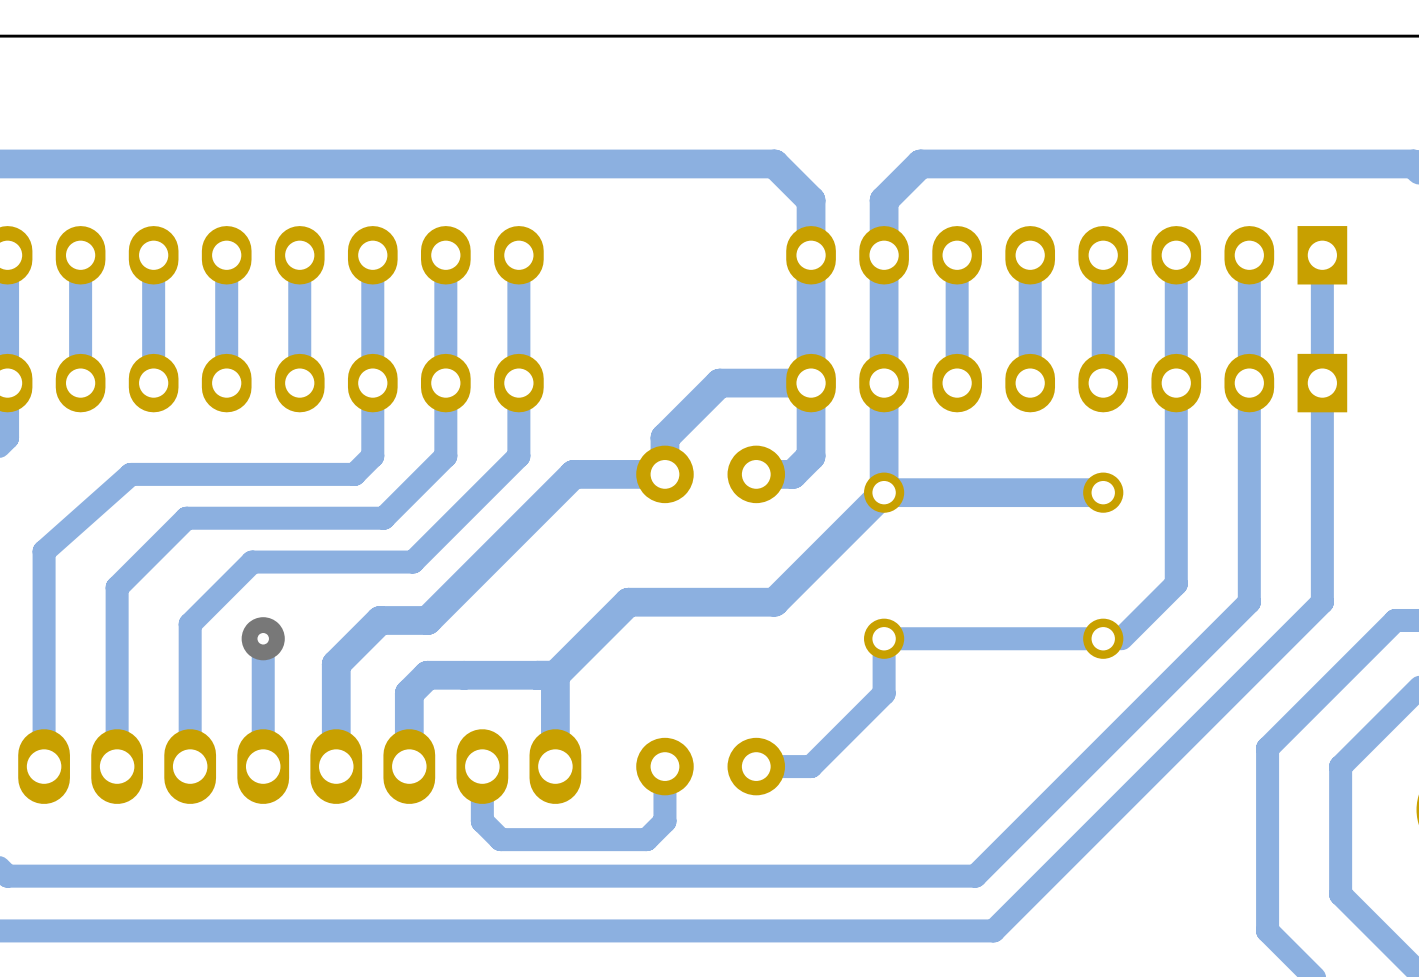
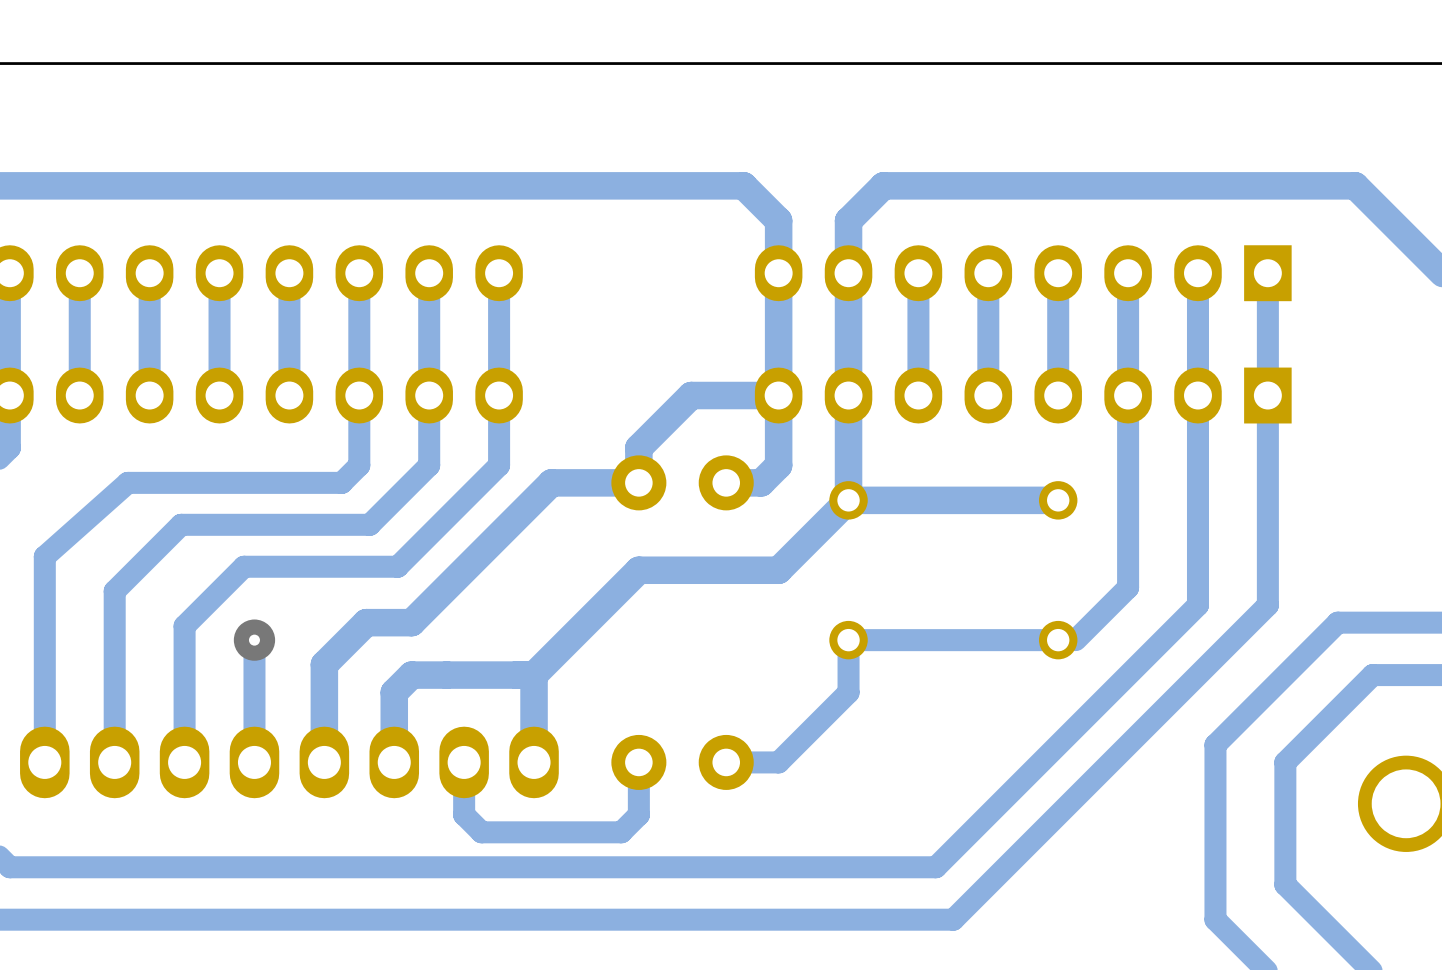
track: (811, 565) (774, 602) (628, 602) -> (778, 570) (638, 570) (603, 605)

